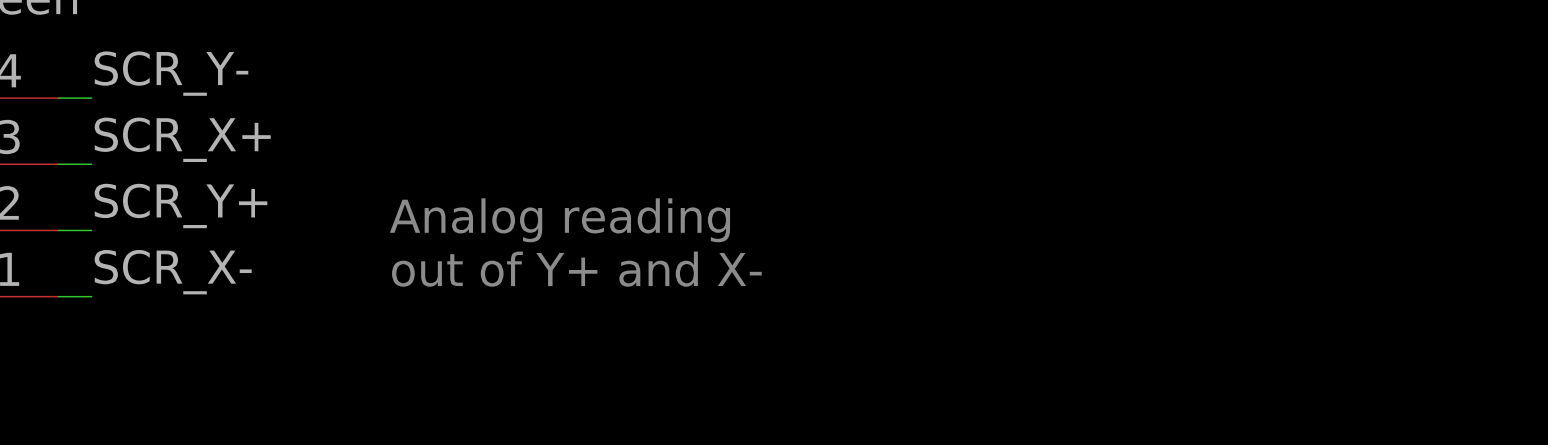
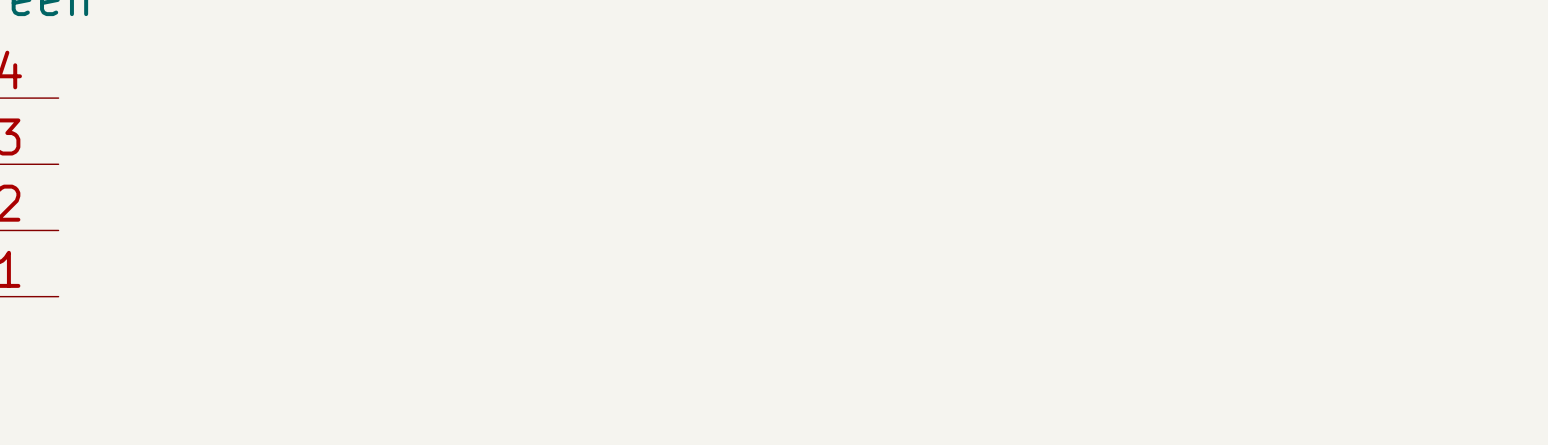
label: SCR_Y- (171, 73) -> none
wire: (58, 98) (91, 98) -> none
label: SCR_X+ (182, 139) -> none
wire: (58, 164) (91, 164) -> none
label: SCR_Y+ (181, 205) -> none
text: Analog reading (559, 220) -> none
wire: (58, 230) (91, 230) -> none
text: out of Y+ and X- (576, 269) -> none
label: SCR_X- (173, 272) -> none
wire: (58, 296) (91, 296) -> none

